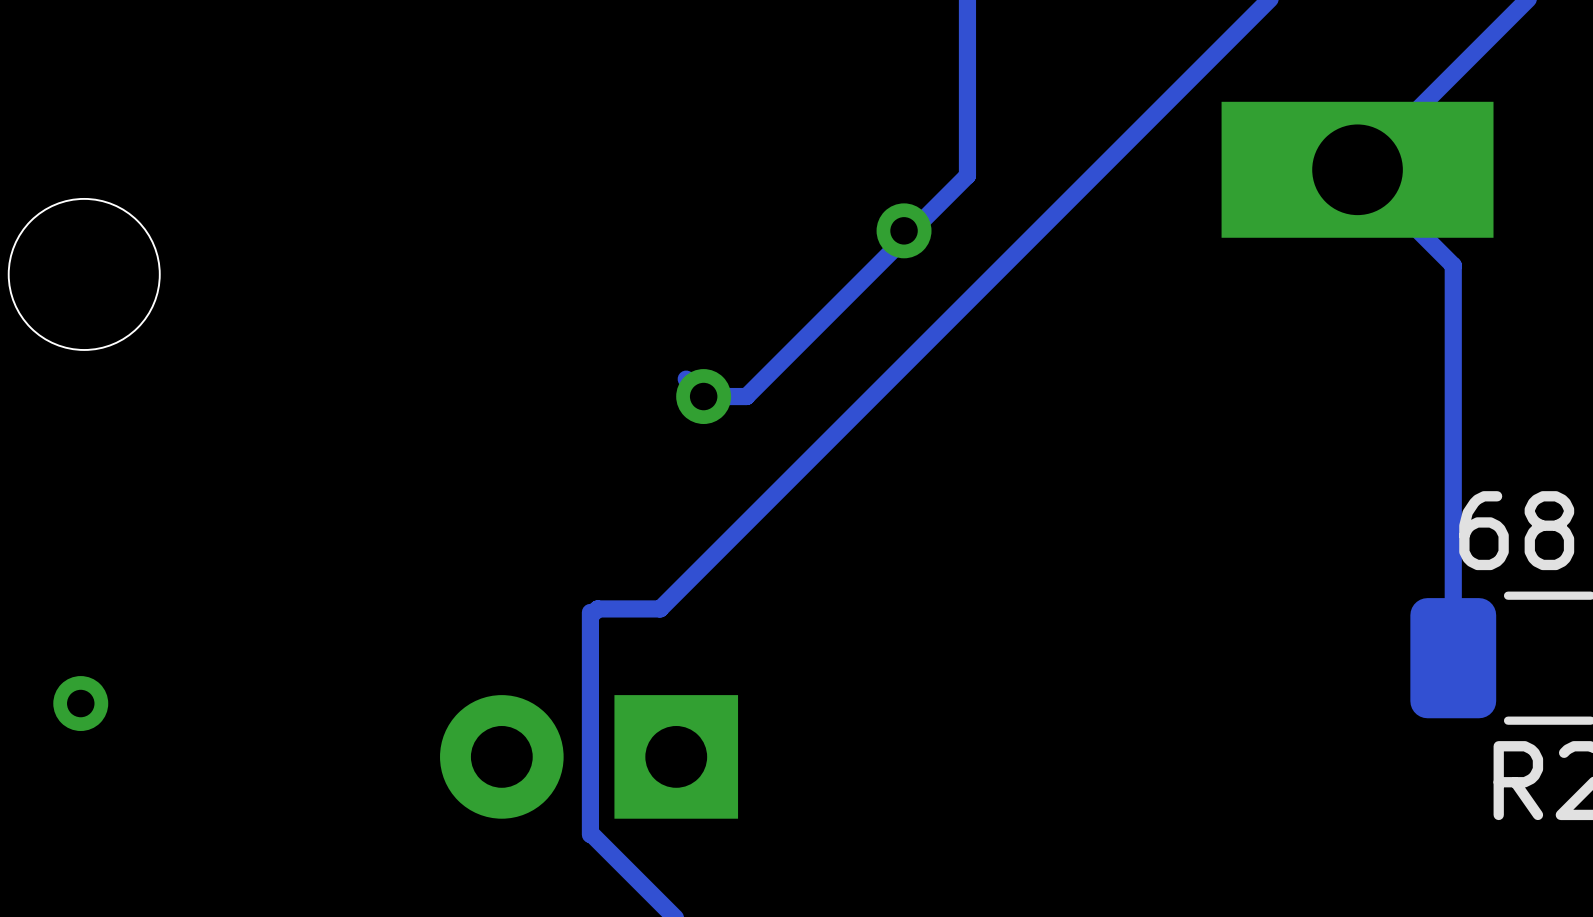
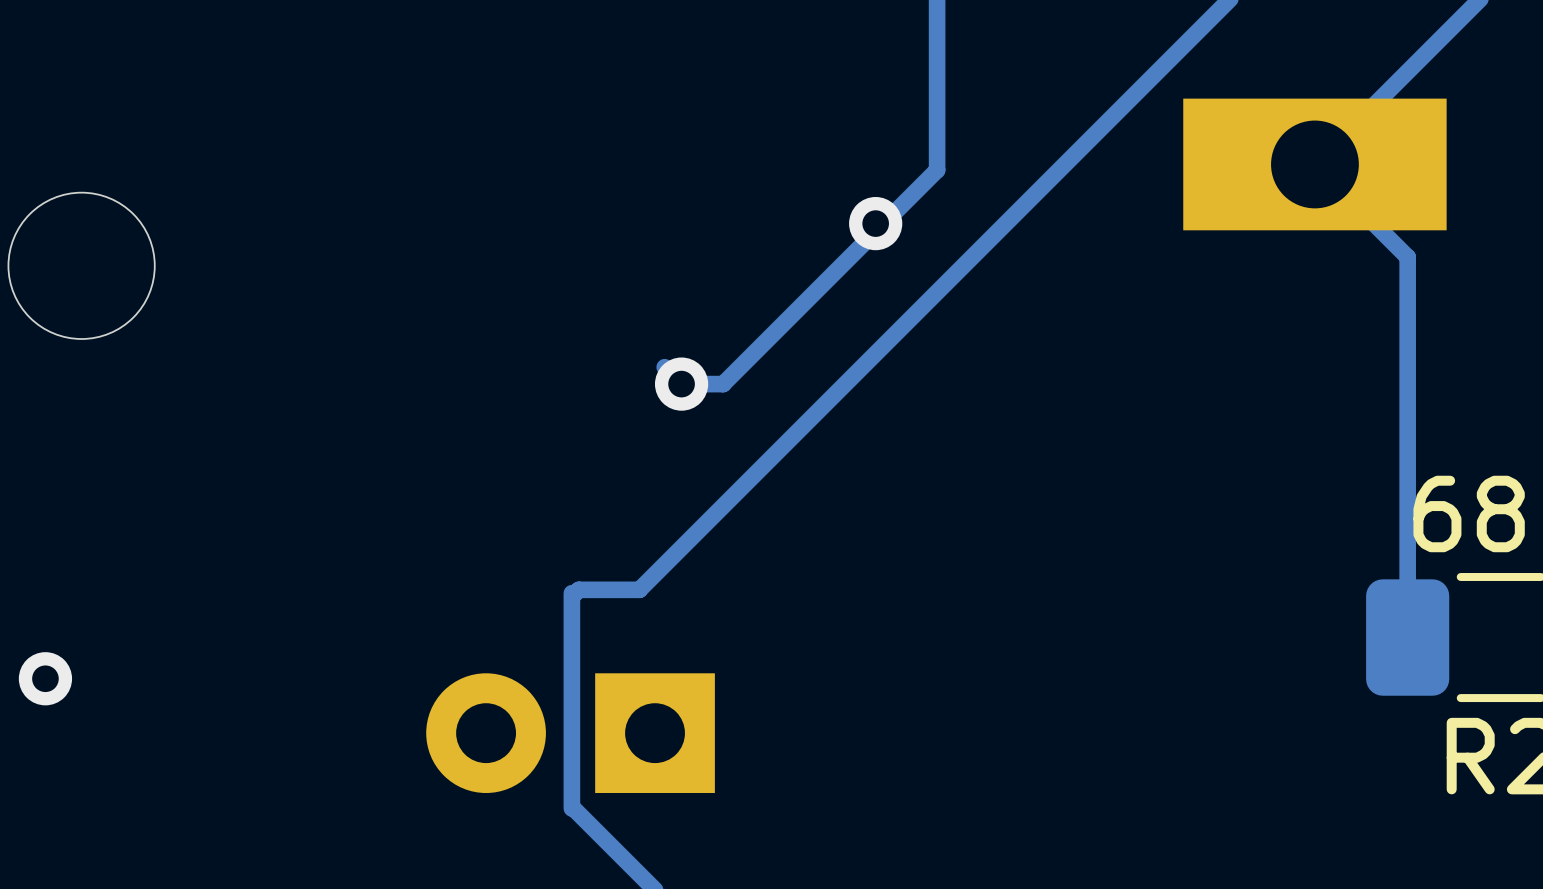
via position: (80, 703) -> (45, 678)

